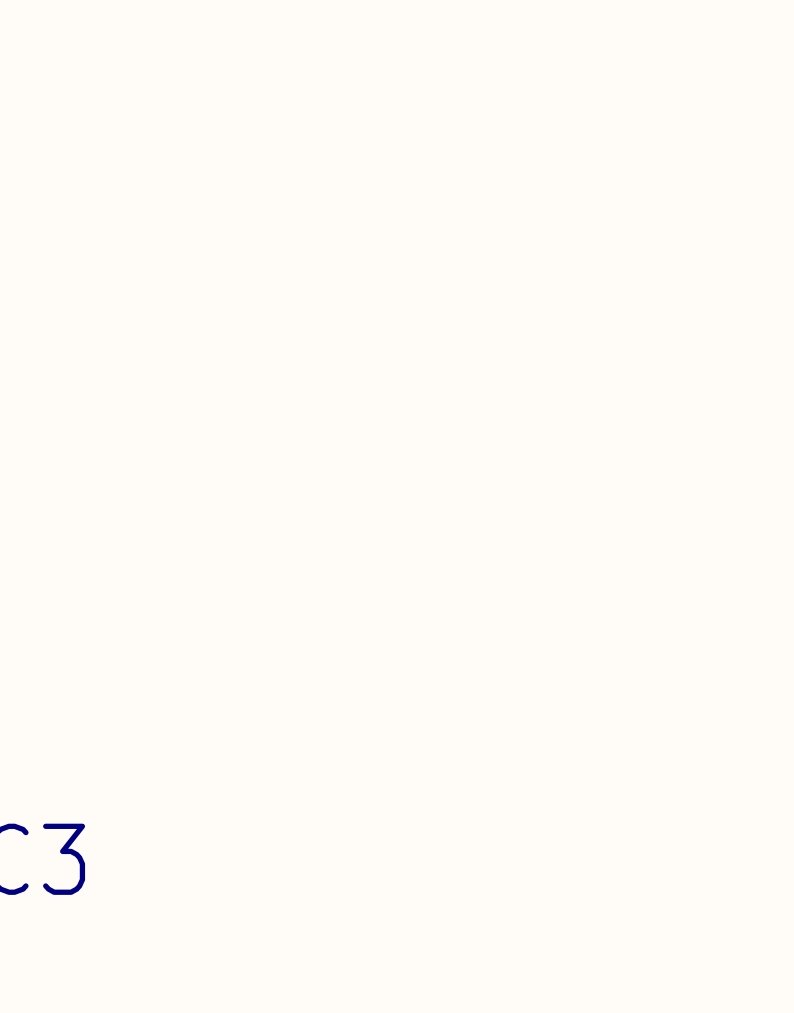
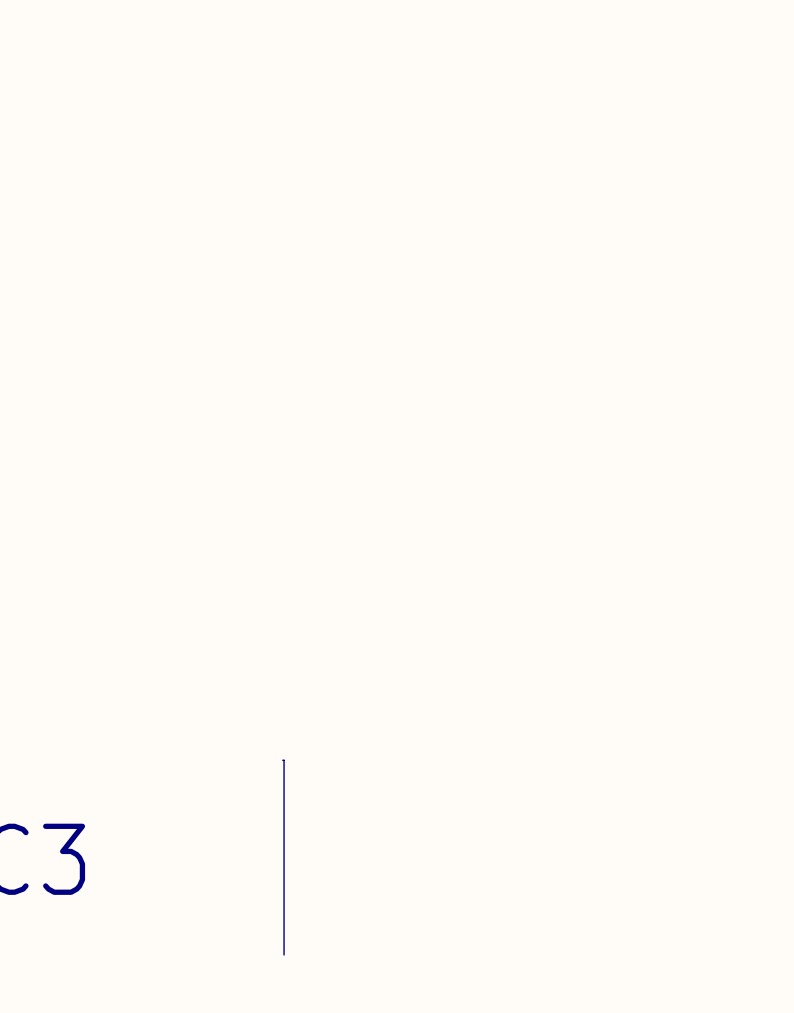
wire: none -> (282, 760) (284, 954)

